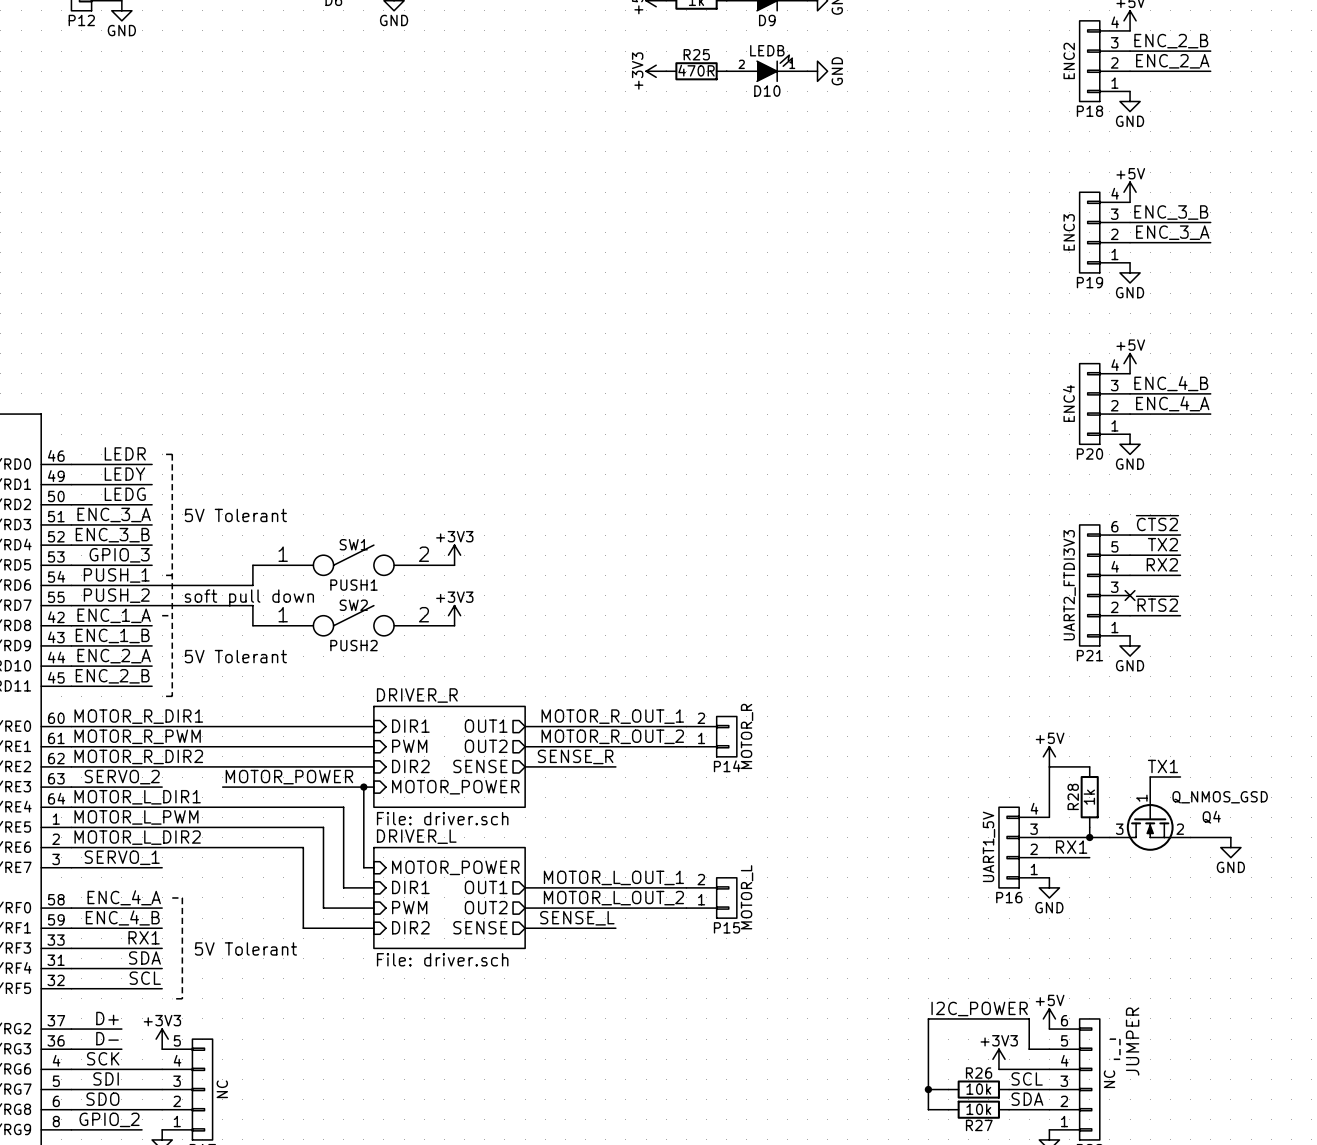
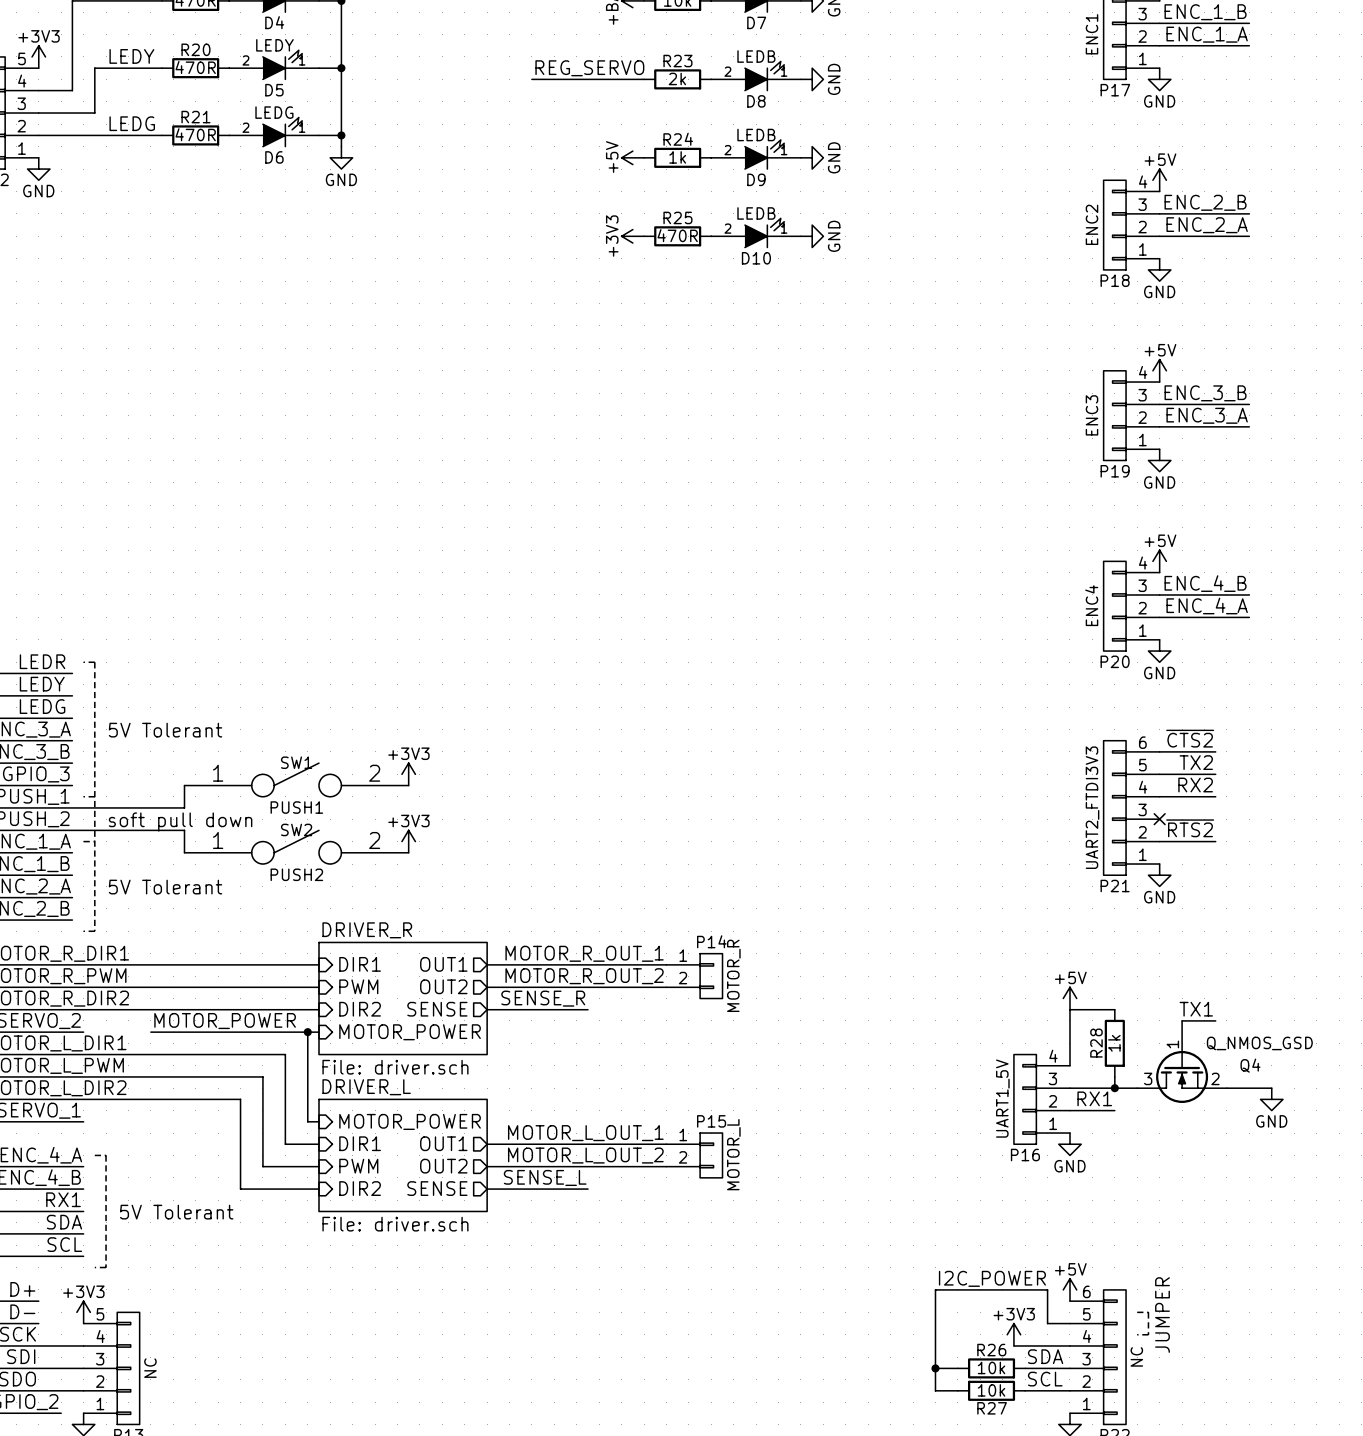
P14 flip: as is (726, 736) -> up-down (711, 976)
P15 flip: as is (726, 897) -> up-down (711, 1155)
label: SCL (1027, 1078) -> SDA (1045, 1356)
label: SDA (1027, 1099) -> SCL (1045, 1379)

